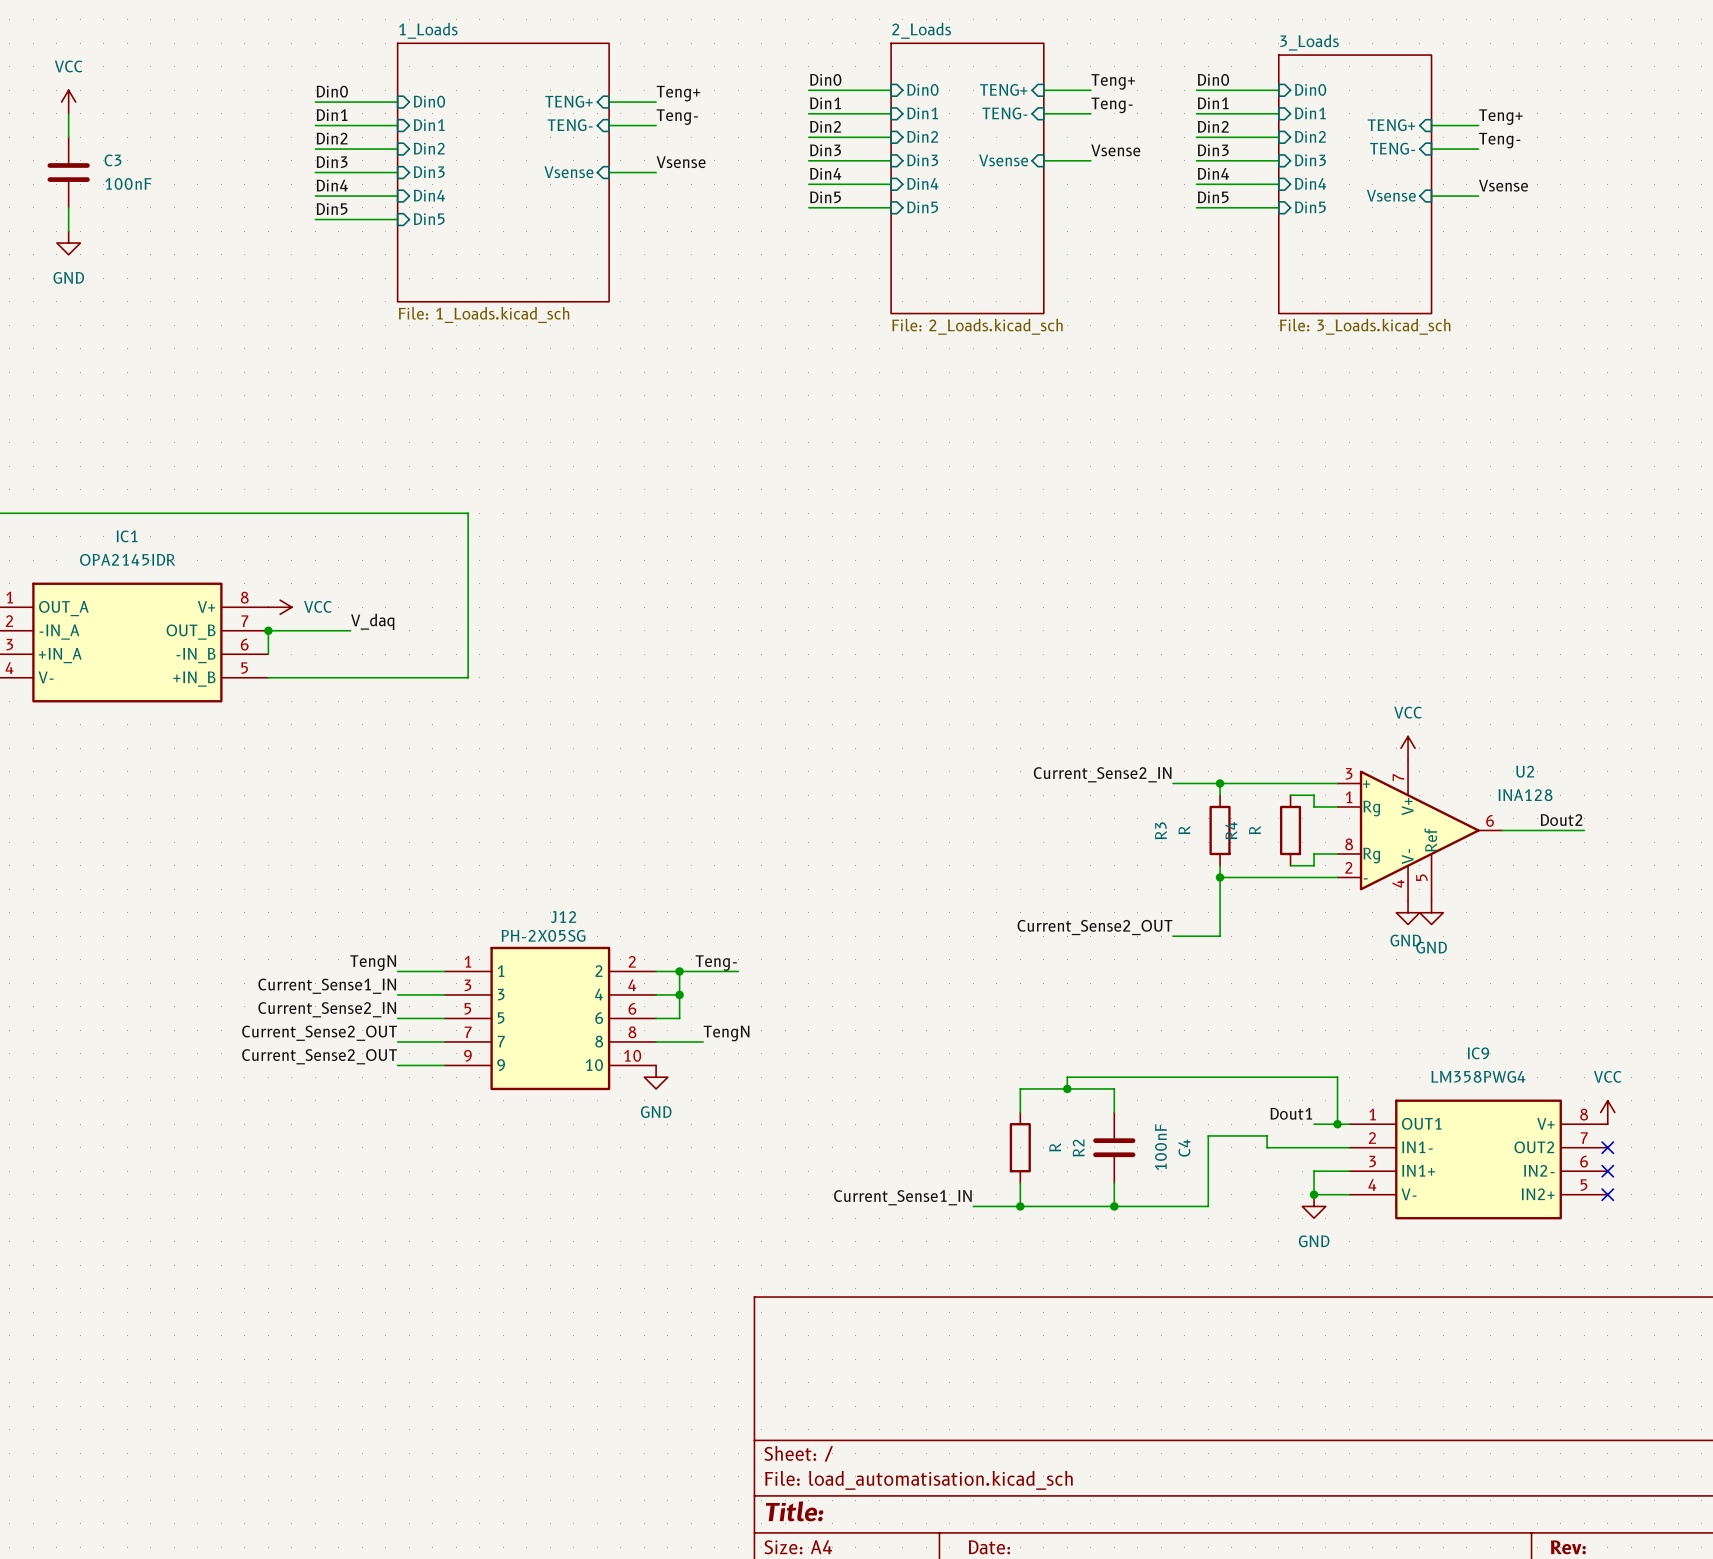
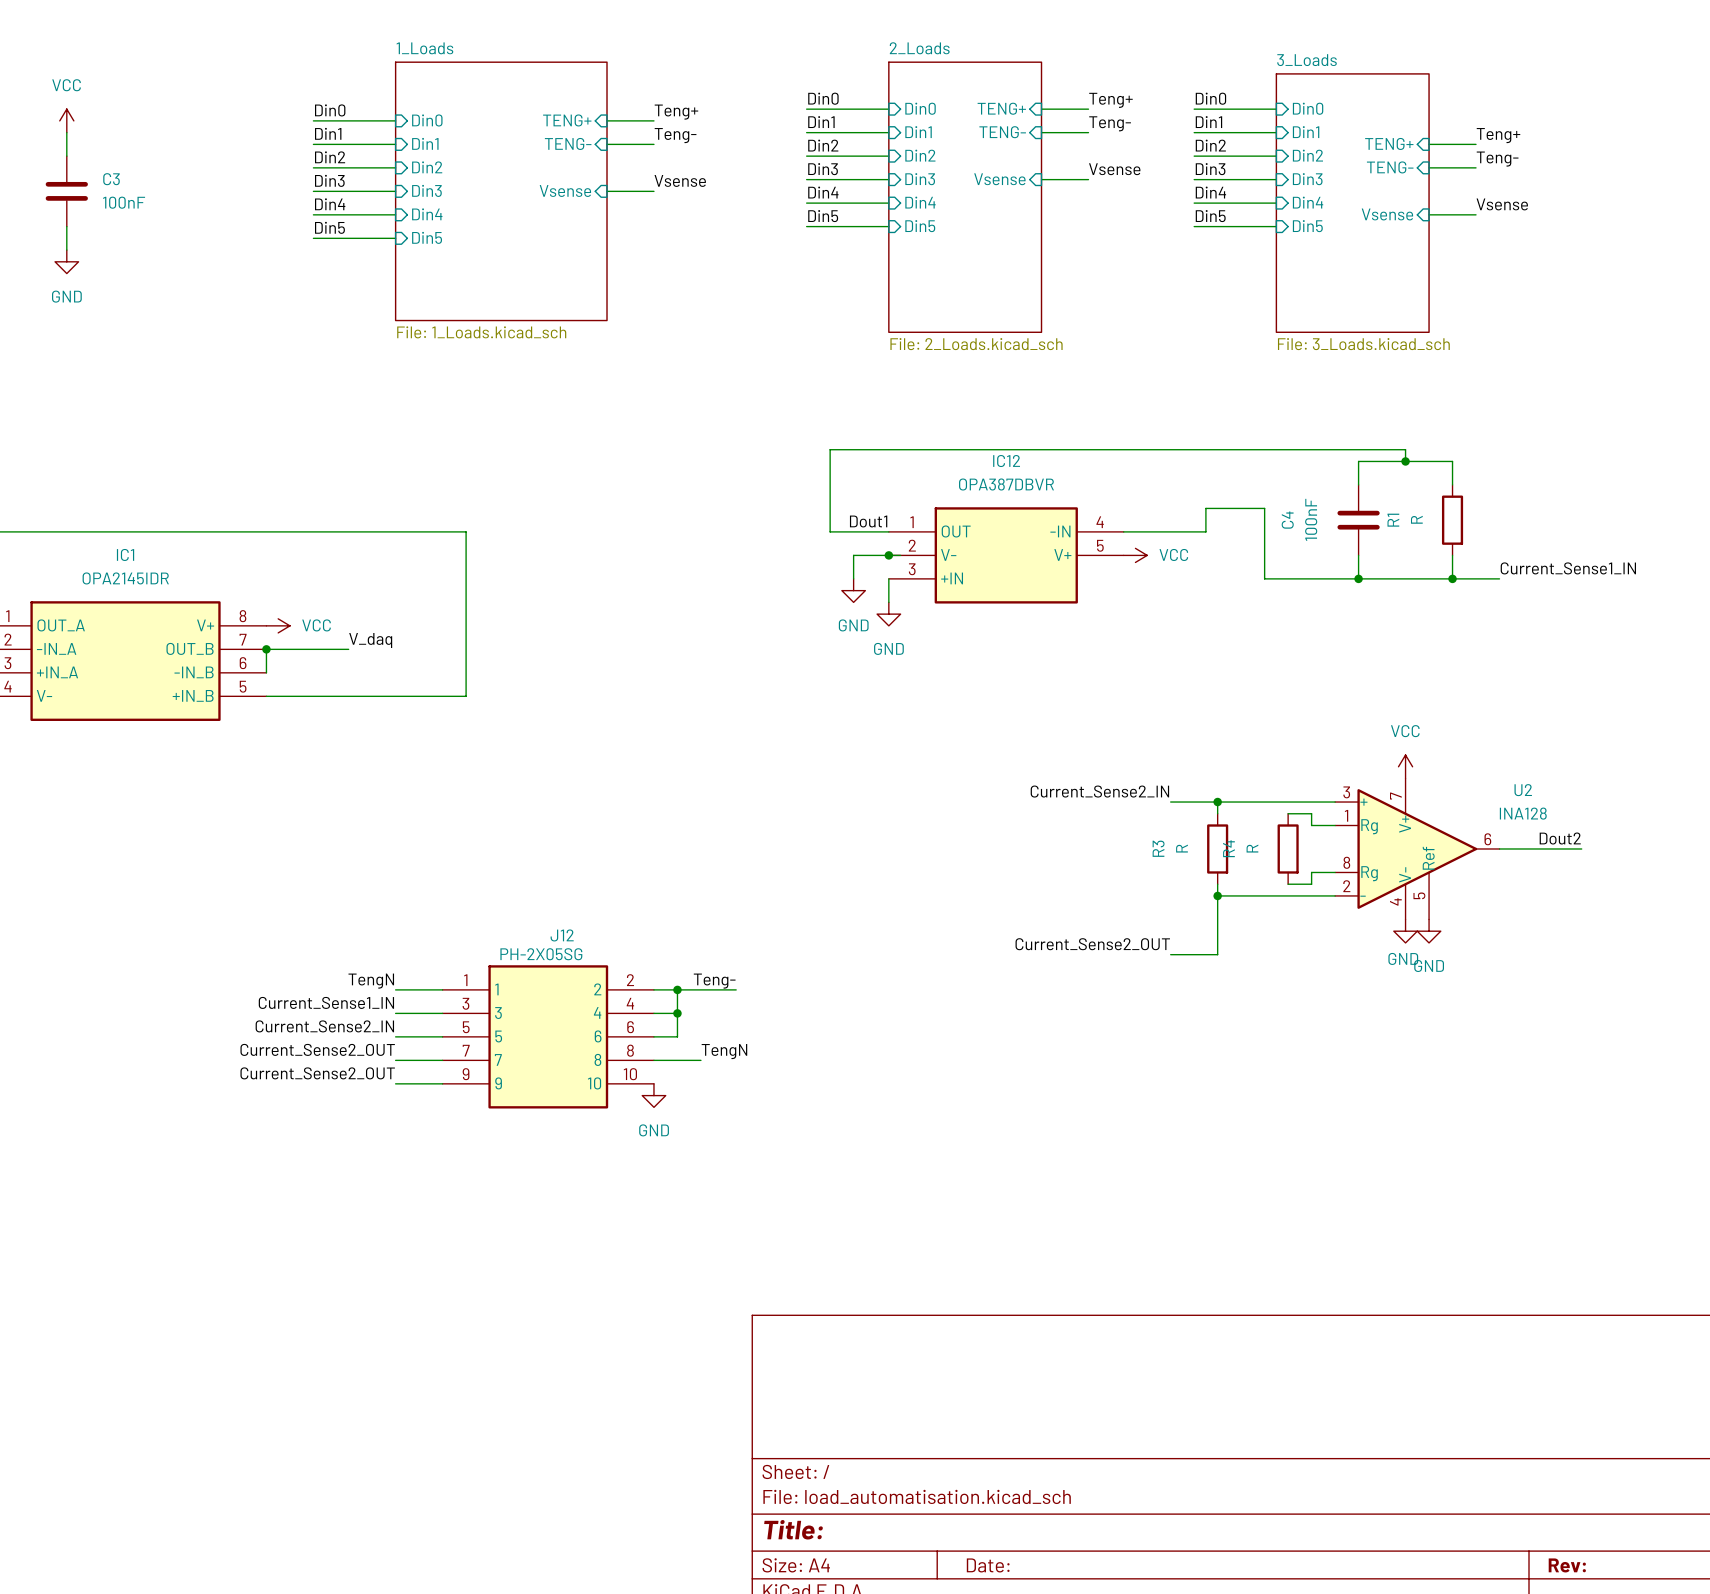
wire: none -> (1405, 461) (1405, 449) (830, 449) (830, 531) (888, 531)
junction: none -> (1405, 461)
wire: none -> (1358, 484) (1358, 461) (1452, 461) (1452, 484)
R1: none -> R (1452, 520)
label: none -> Dout1 (868, 521)
wire: none -> (1123, 531) (1205, 531) (1205, 508) (1264, 508) (1264, 578) (1499, 578)
junction: none -> (888, 555)
wire: none -> (900, 555) (853, 555) (853, 578)
IC12: none -> OPA387DBVR (1006, 555)
power symbol: none -> VCC (1135, 555)
wire: none -> (1358, 555) (1358, 578)
wire: none -> (1452, 555) (1452, 578)
label: none -> Current_Sense1_IN (1568, 568)
wire: none -> (888, 578) (888, 602)
junction: none -> (1358, 578)
junction: none -> (1452, 578)
power symbol: none -> GND (853, 590)
power symbol: none -> GND (888, 614)
wire: (1067, 1088) (1067, 1077) (1337, 1077) (1337, 1124) -> none
junction: (1067, 1088) -> none
wire: (1020, 1112) (1020, 1088) (1114, 1088) (1114, 1112) -> none
power symbol: VCC (1607, 1112) -> none
label: Dout1 (1291, 1113) -> none
wire: (1314, 1124) (1349, 1124) -> none
junction: (1337, 1124) -> none
R2: R (1020, 1147) -> none
C4 position: (1114, 1147) -> (1358, 520)
C4 value position: 100nF (1160, 1147) -> 100nF (1311, 519)
wire: (1349, 1147) (1267, 1147) (1267, 1135) (1208, 1135) (1208, 1206) (973, 1206) -> none
no-connect mark: (1607, 1147) -> none
C4 name position: C4 (1184, 1148) -> C4 (1287, 520)
IC9: LM358PWG4 (1478, 1159) -> none
wire: (1349, 1171) (1314, 1171) (1314, 1194) (1349, 1194) -> none
no-connect mark: (1607, 1171) -> none
wire: (1020, 1182) (1020, 1206) -> none
wire: (1114, 1182) (1114, 1206) -> none
junction: (1314, 1194) -> none
no-connect mark: (1607, 1194) -> none
label: Current_Sense1_IN (902, 1197) -> none
junction: (1020, 1206) -> none
junction: (1114, 1206) -> none
power symbol: GND (1314, 1206) -> none

